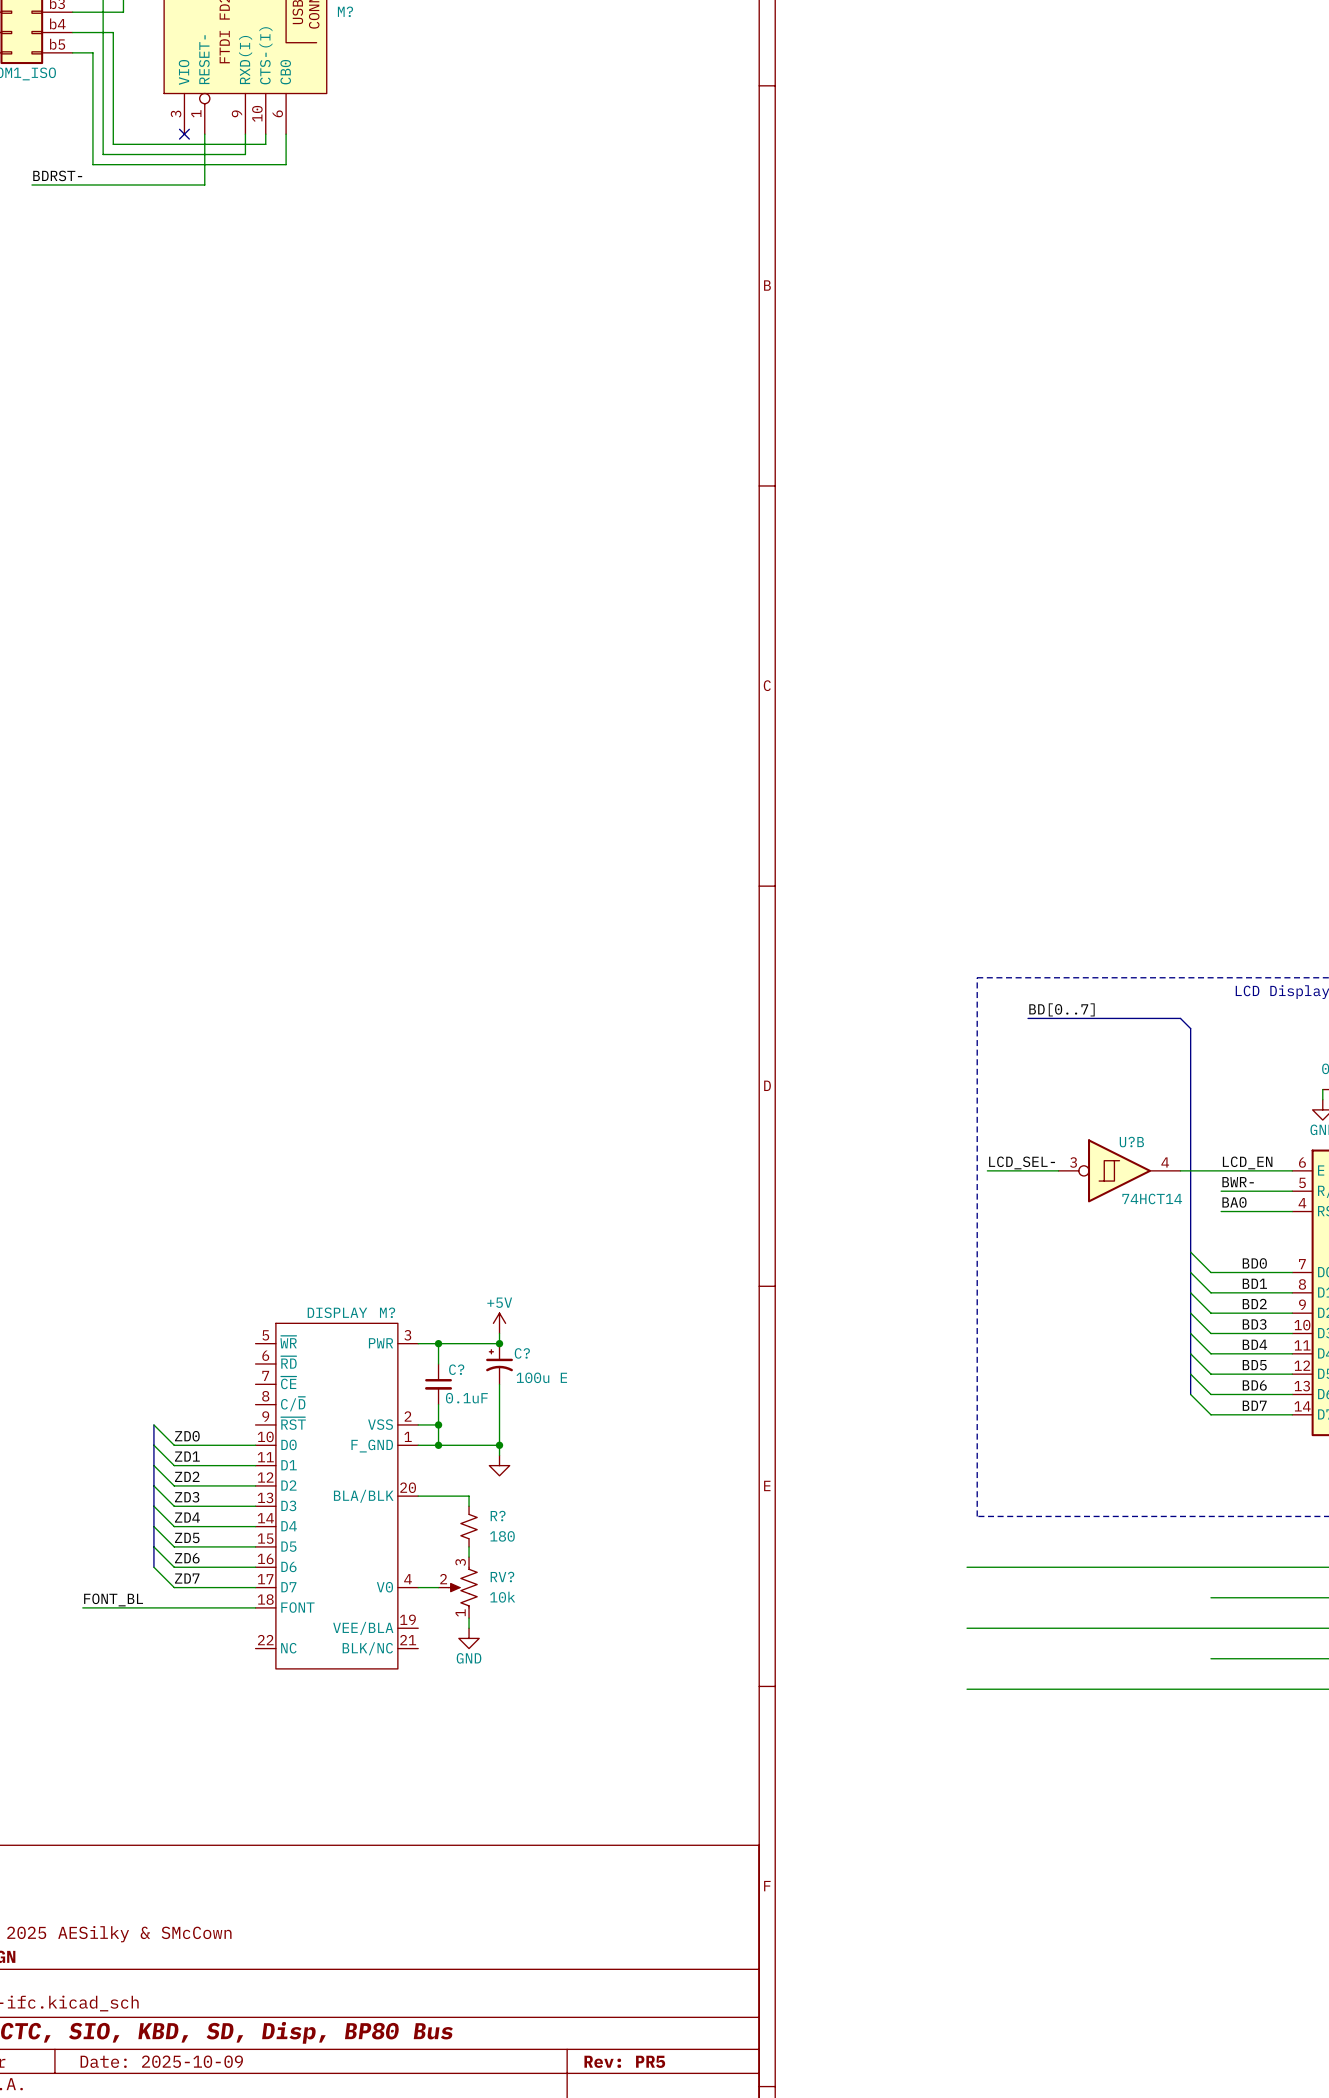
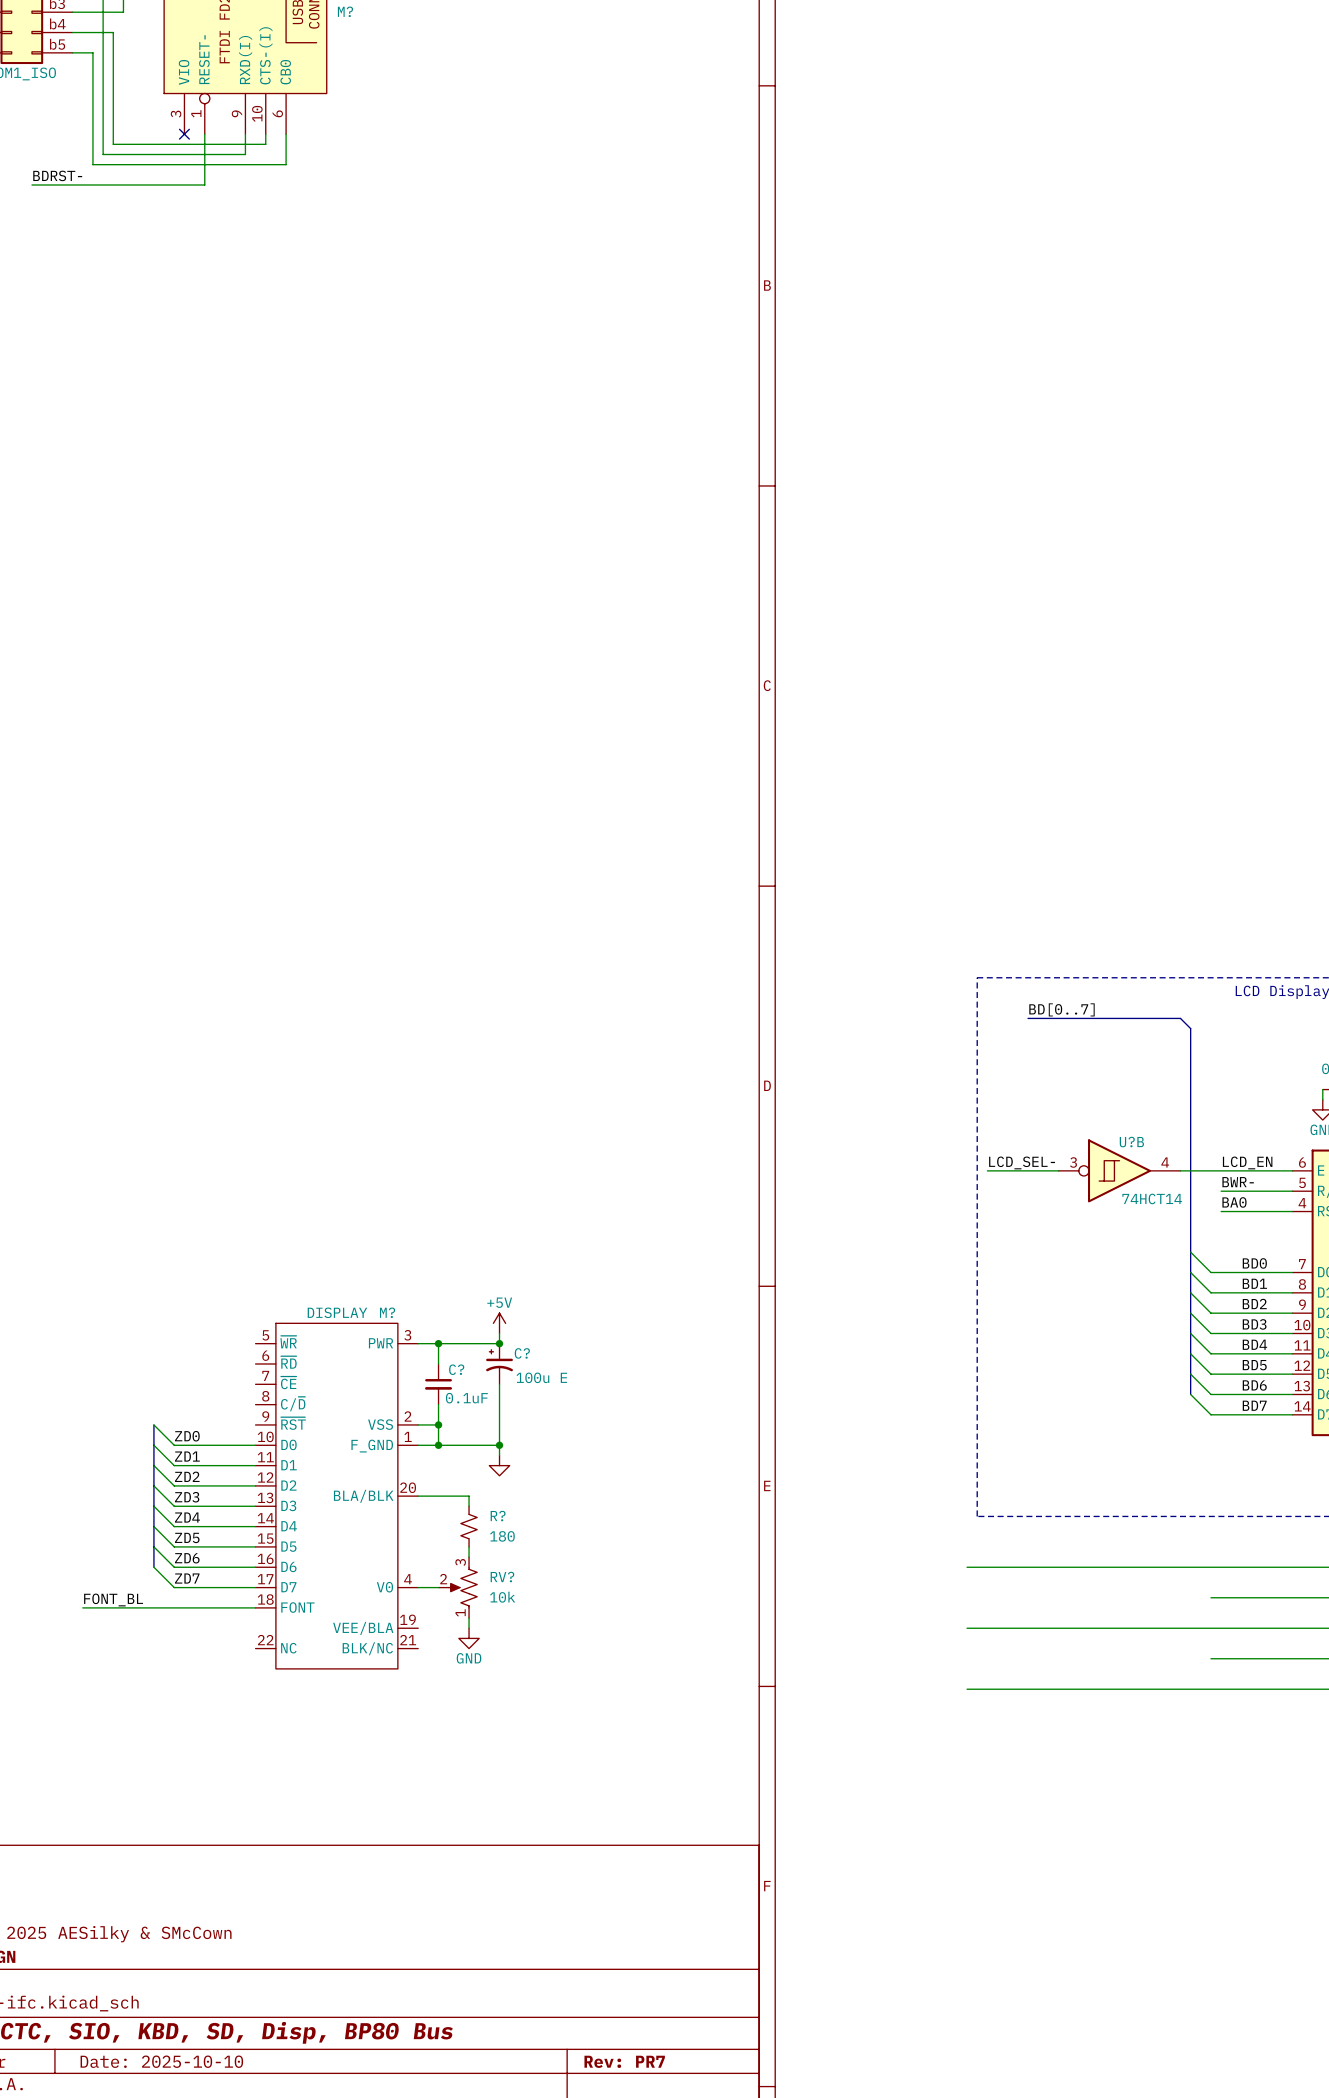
title block: Date: 2025-10-09 (161, 2061) -> Date: 2025-10-10 (161, 2061)
title block: Rev: PR5 (624, 2061) -> Rev: PR7 (624, 2061)

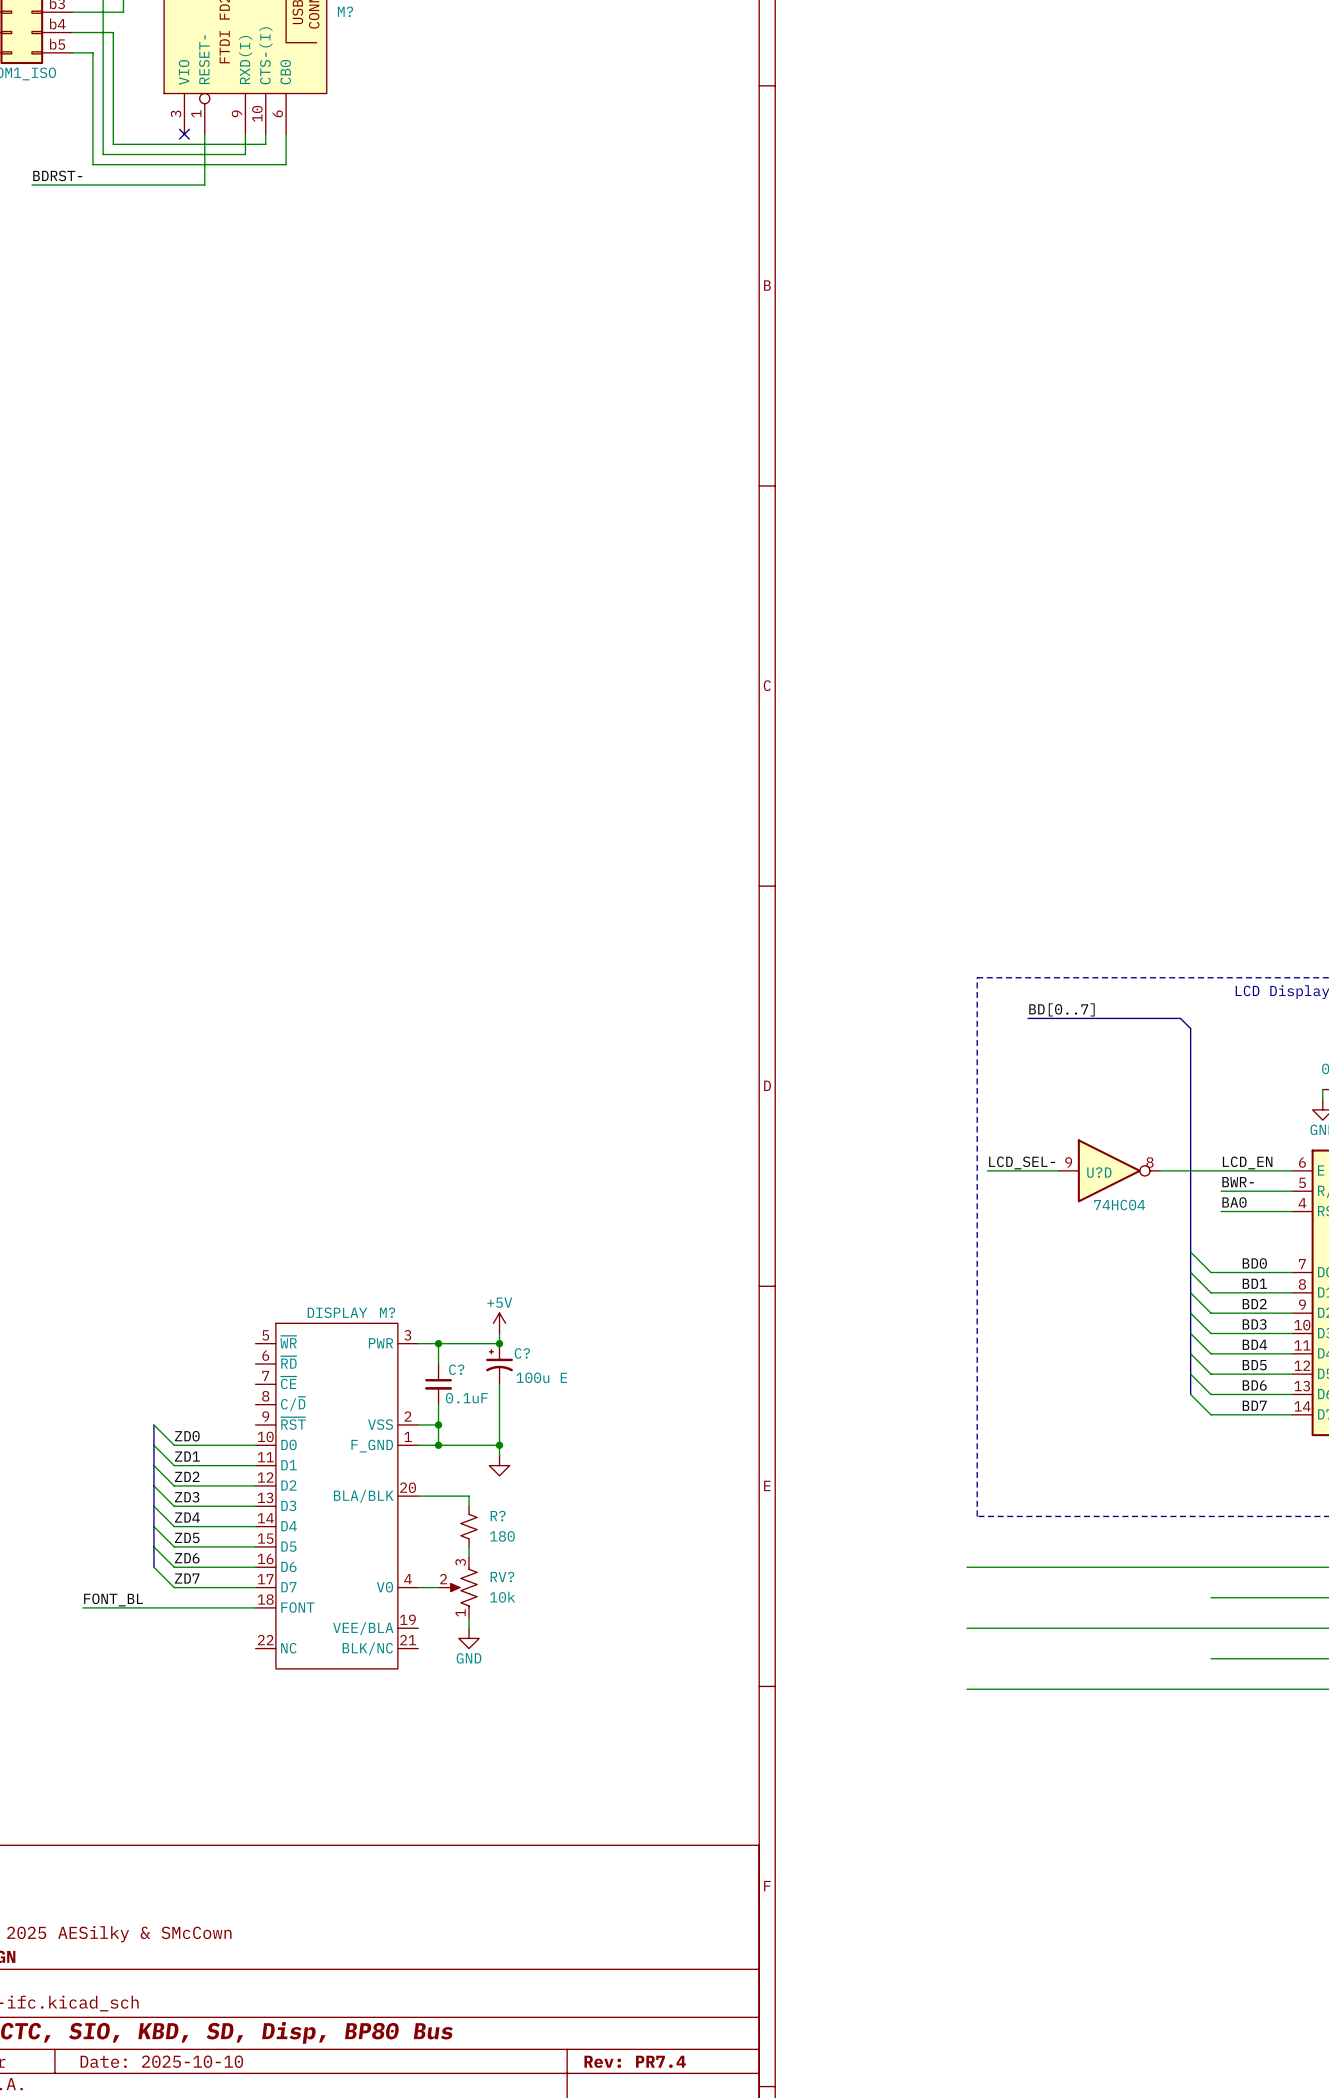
U?D: none -> 74HC04 (1109, 1170)
U?B: 74HCT14 (1119, 1170) -> none
title block: Rev: PR7 (624, 2061) -> Rev: PR7.4 (635, 2061)

